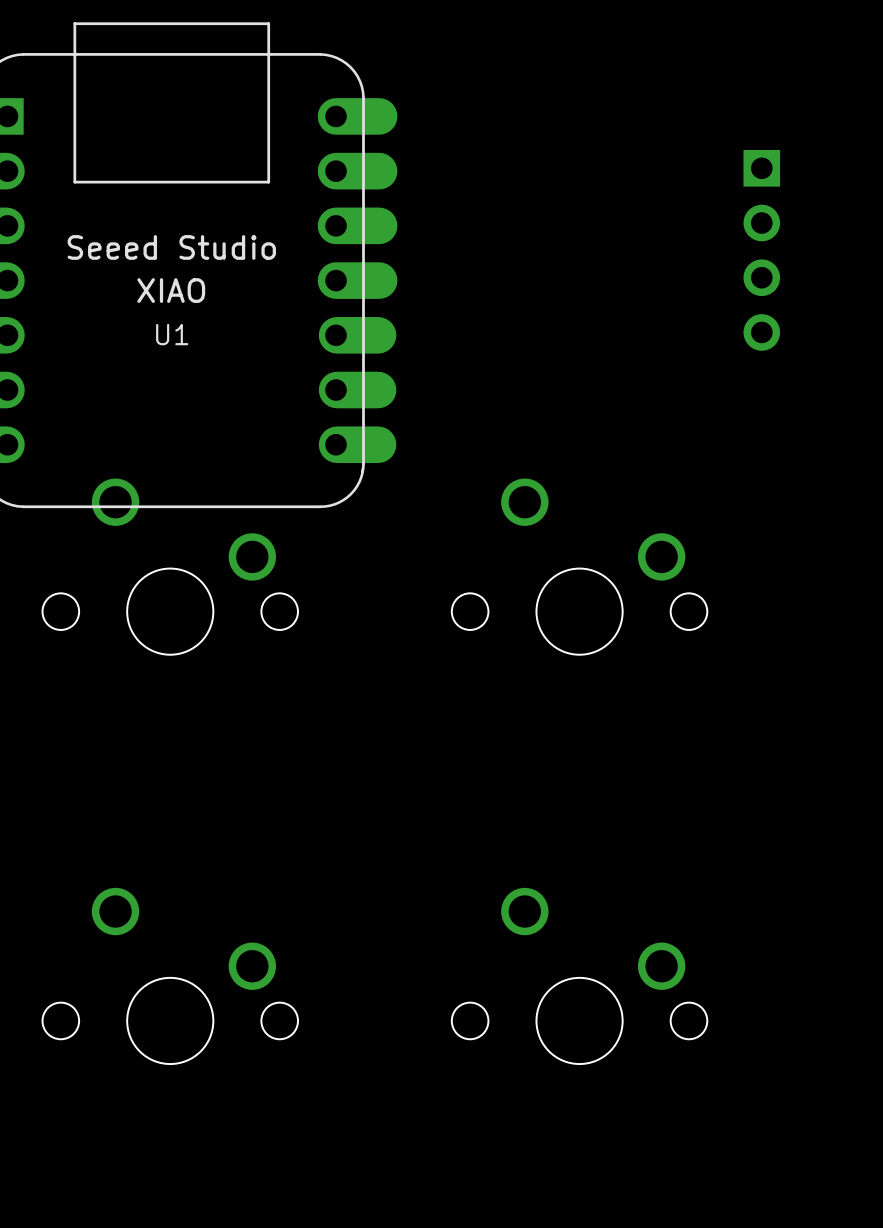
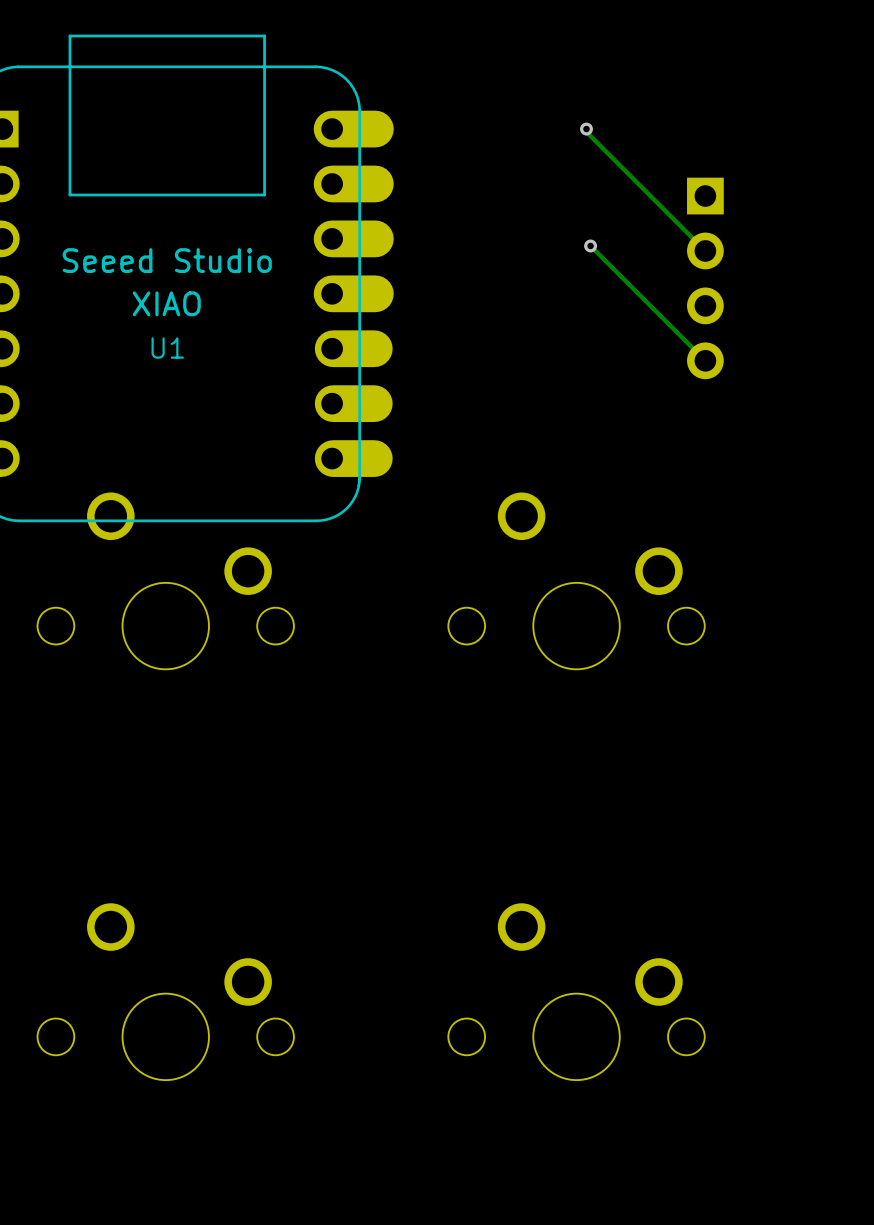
track: none -> (586, 129) (586, 132) (705, 250)
via: none -> (586, 129)
track: none -> (590, 245) (705, 360)
via: none -> (590, 245)
part position: (761, 250) -> (705, 278)

